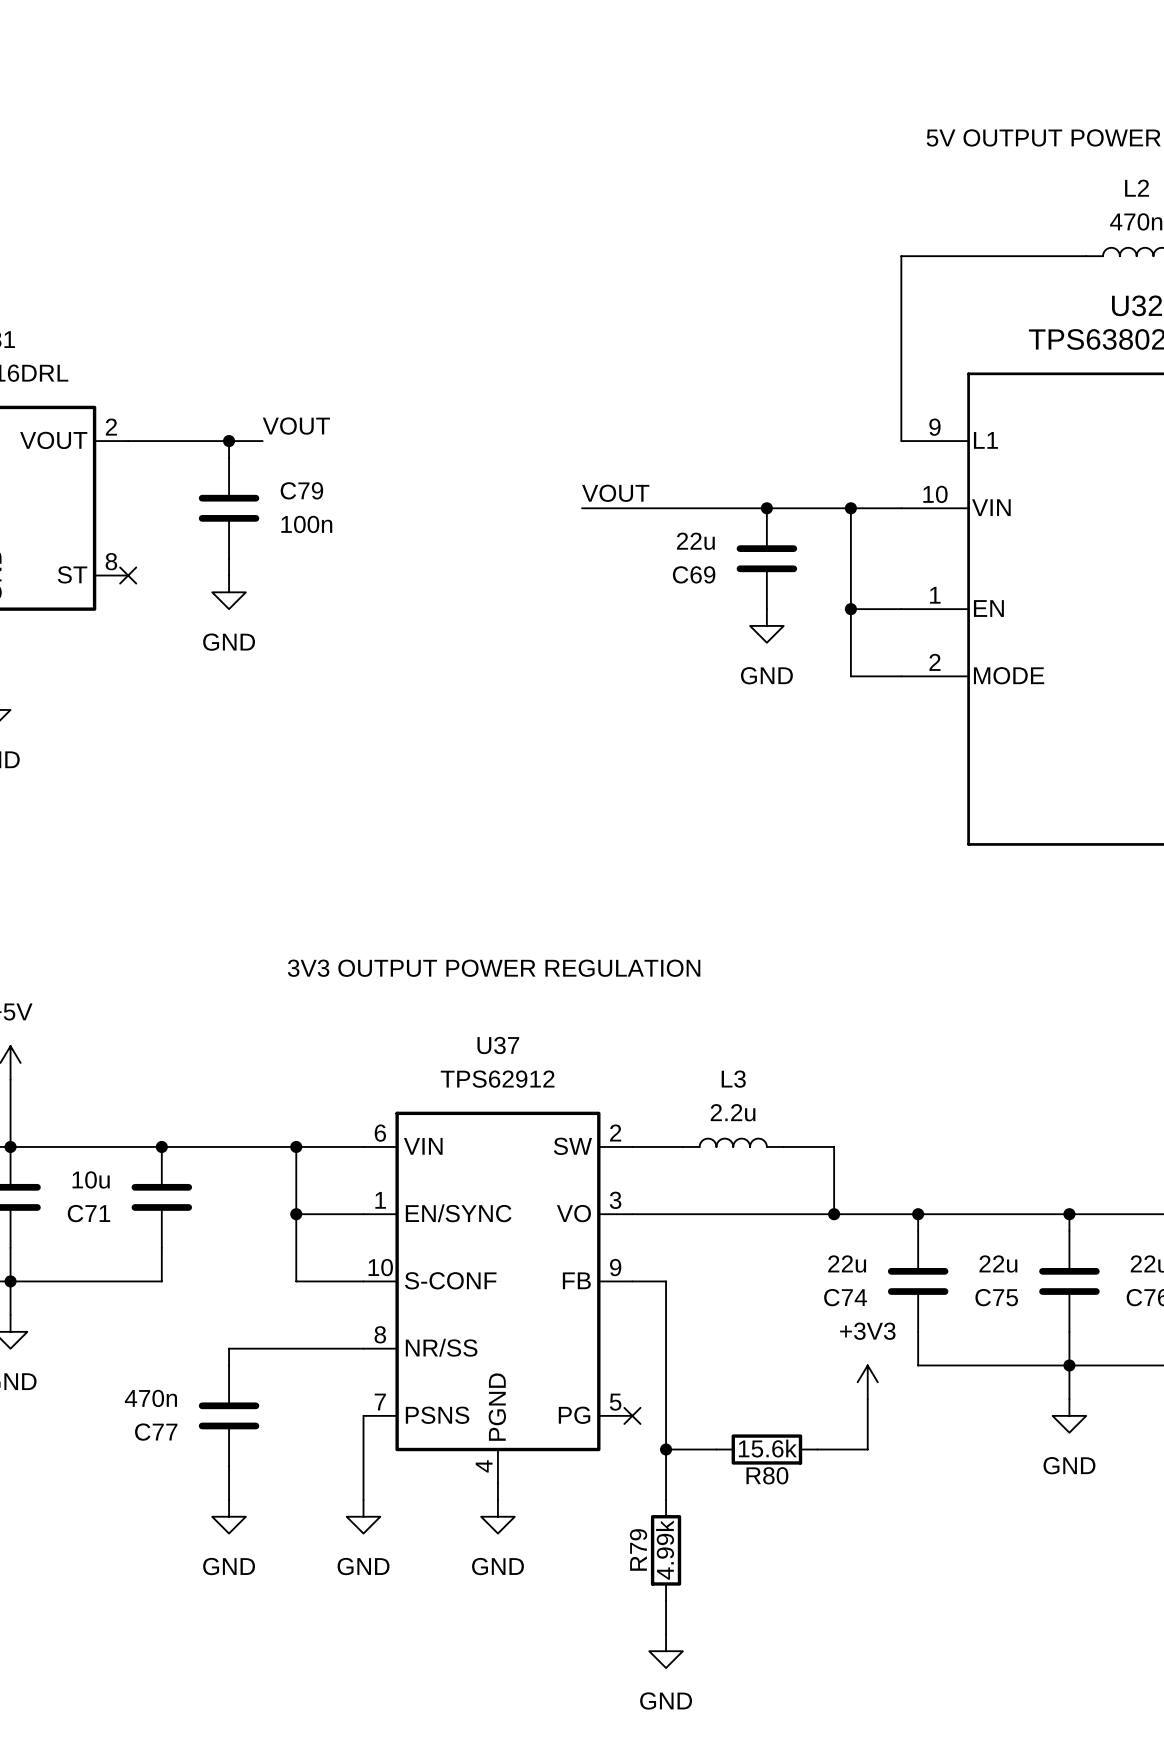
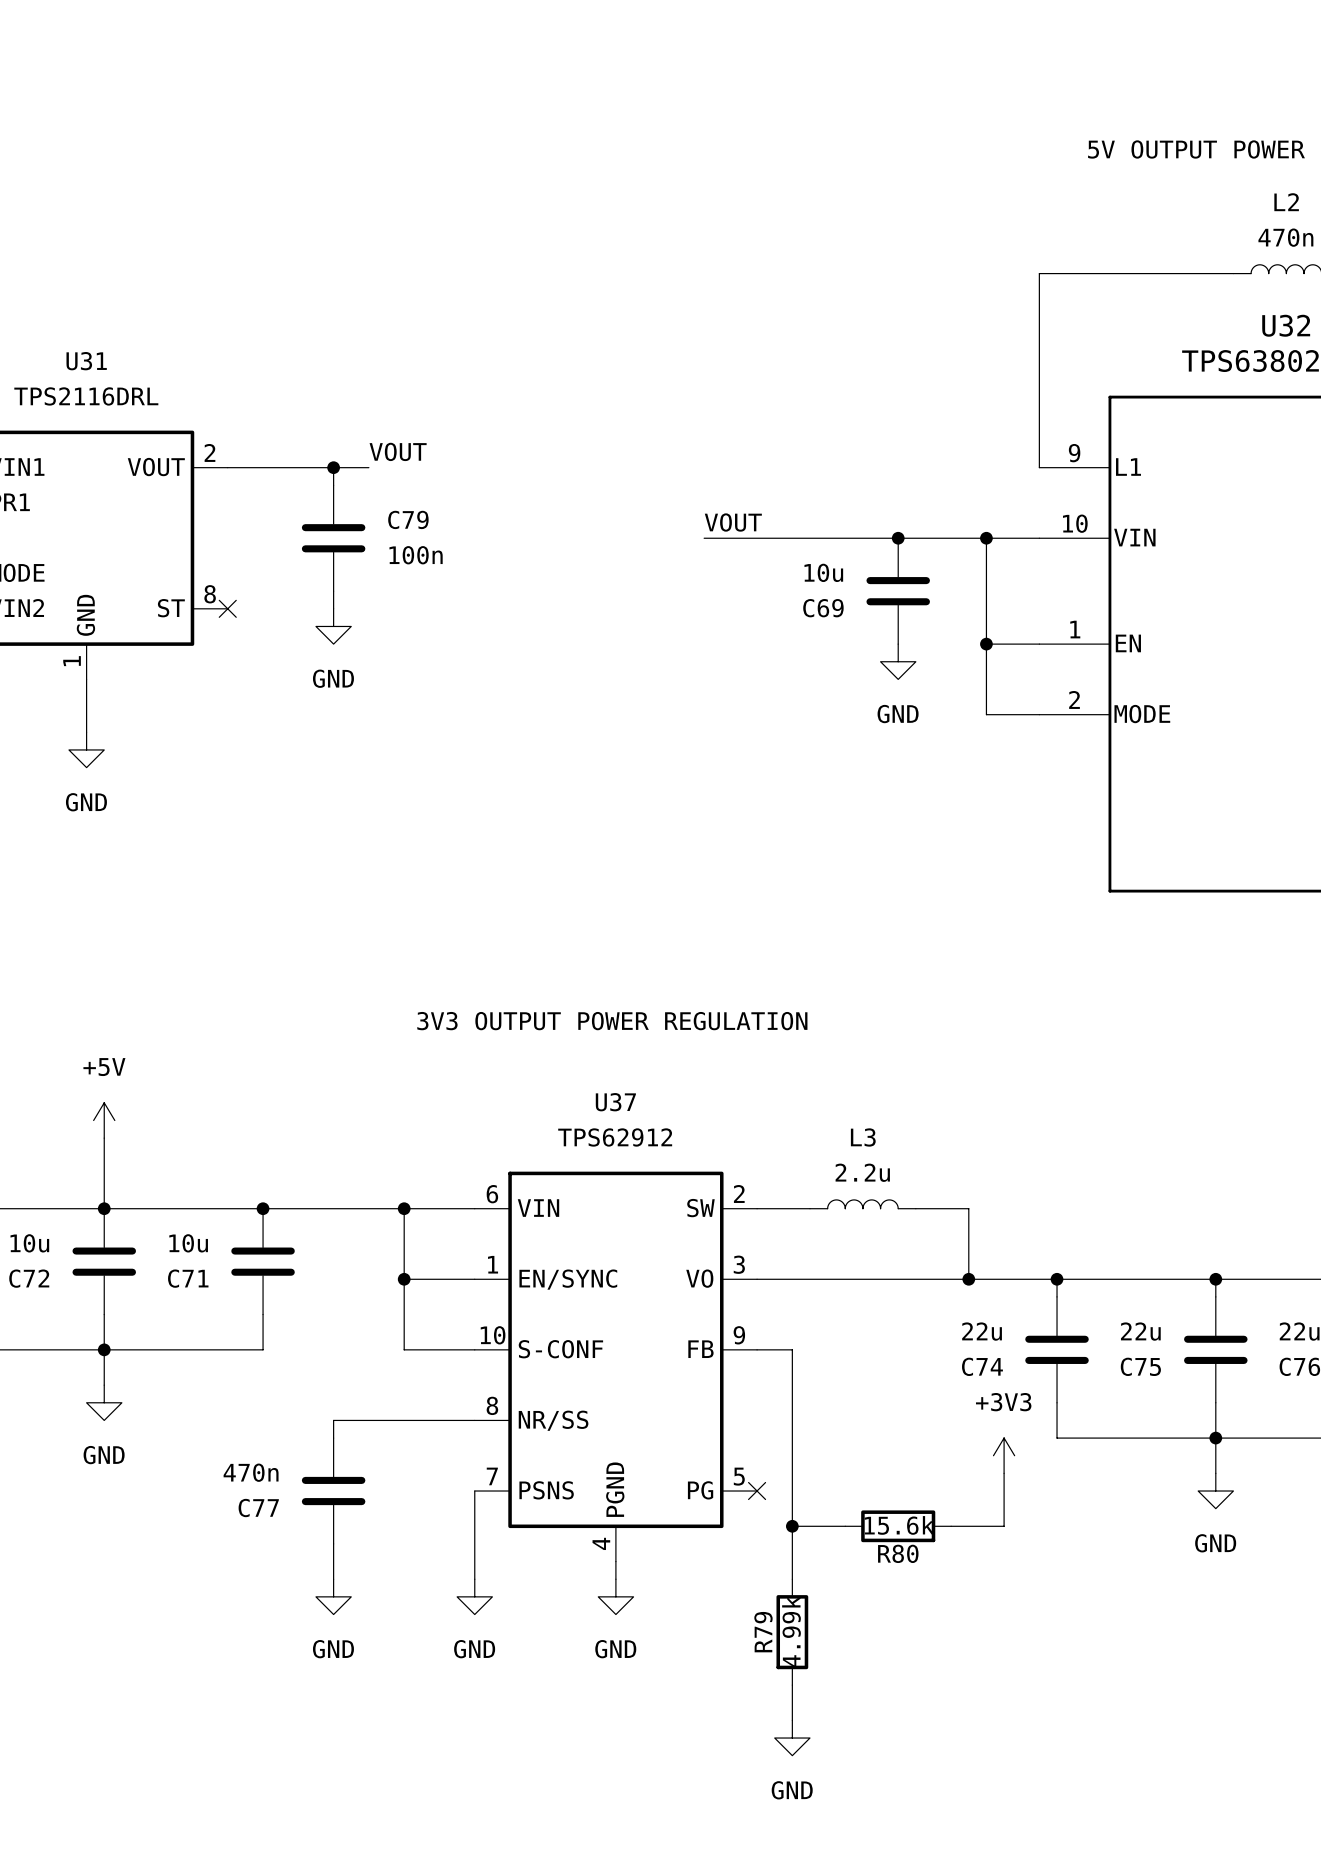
C69 value: 22u (695, 541) -> 10u (823, 572)

